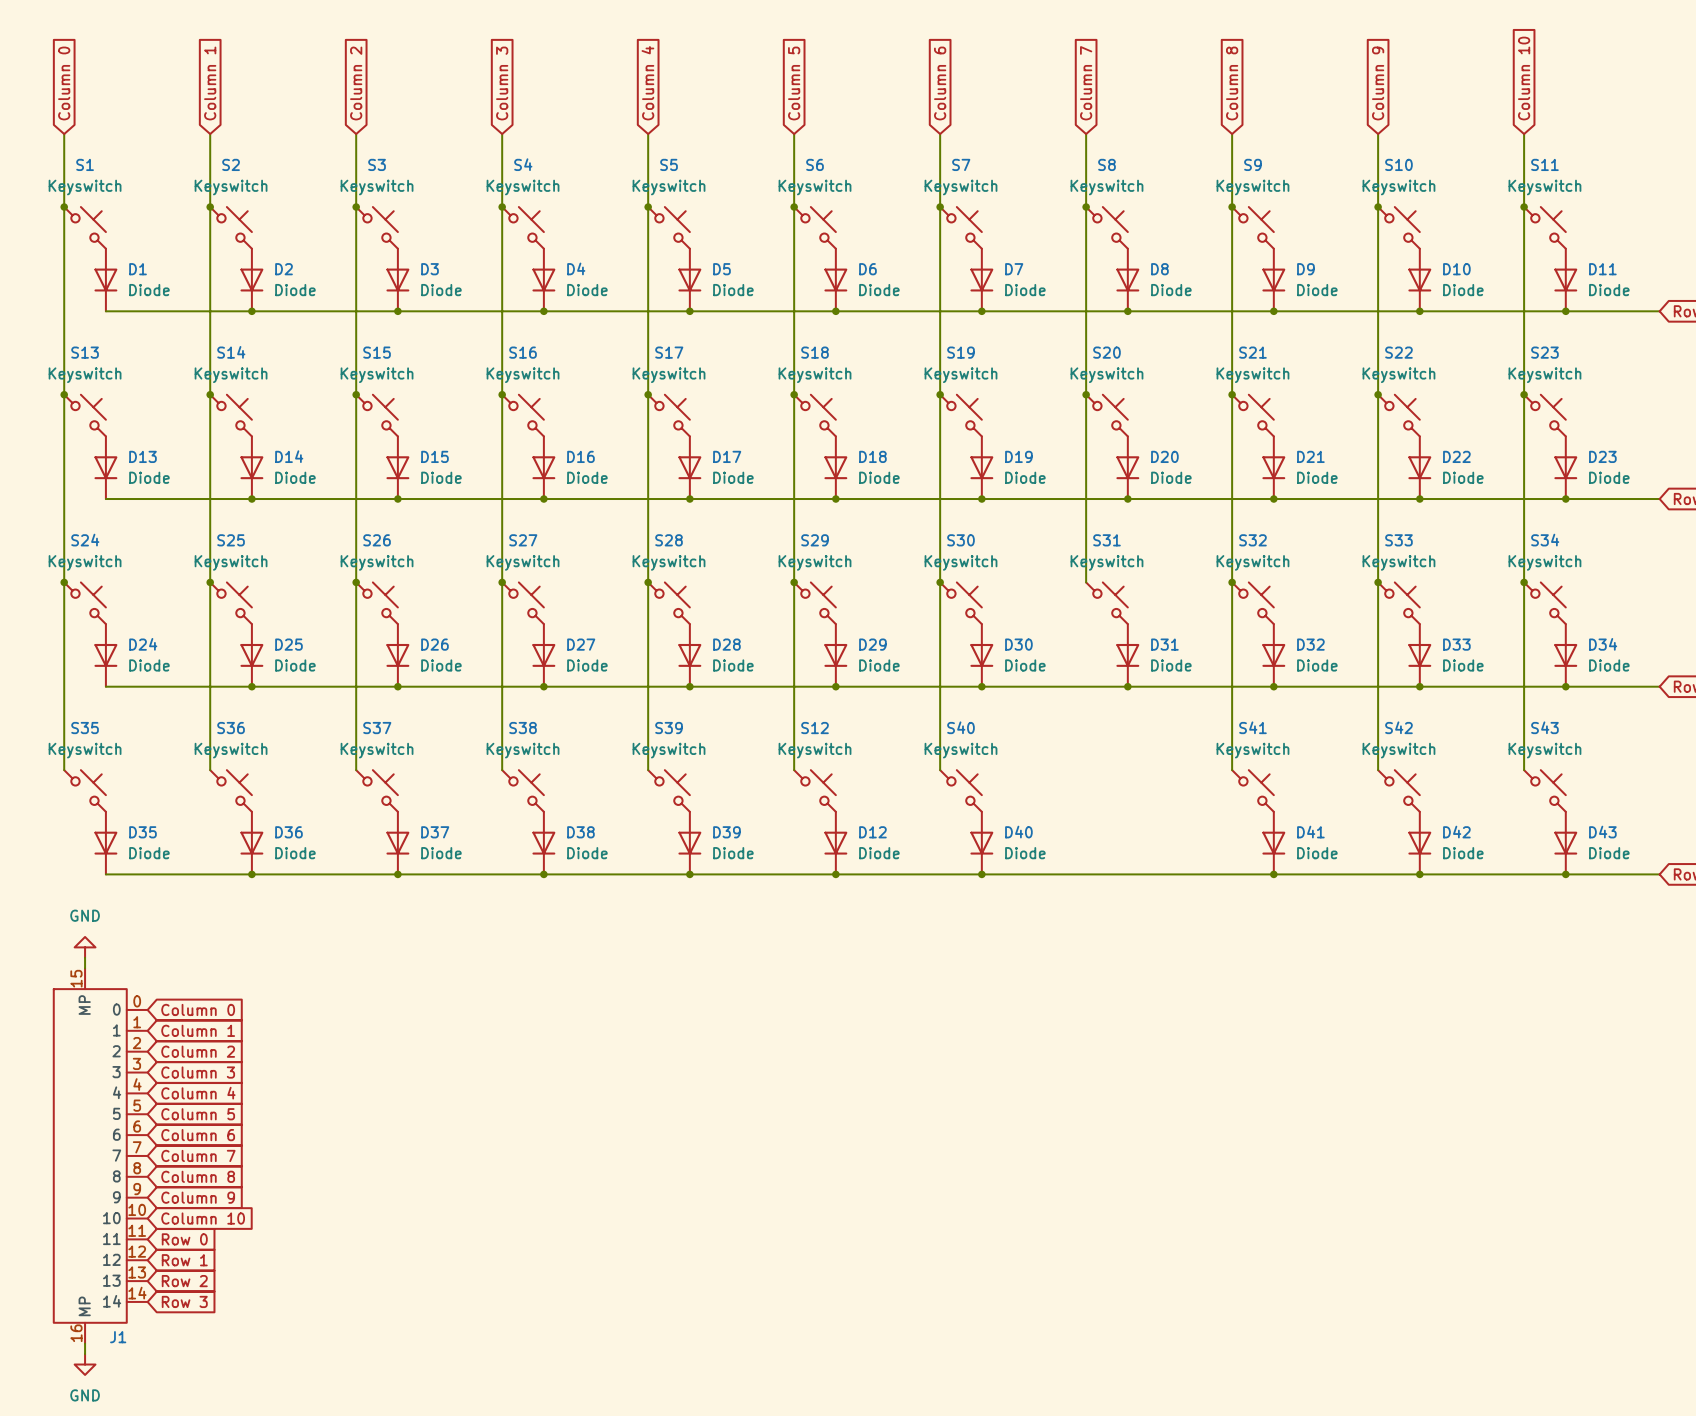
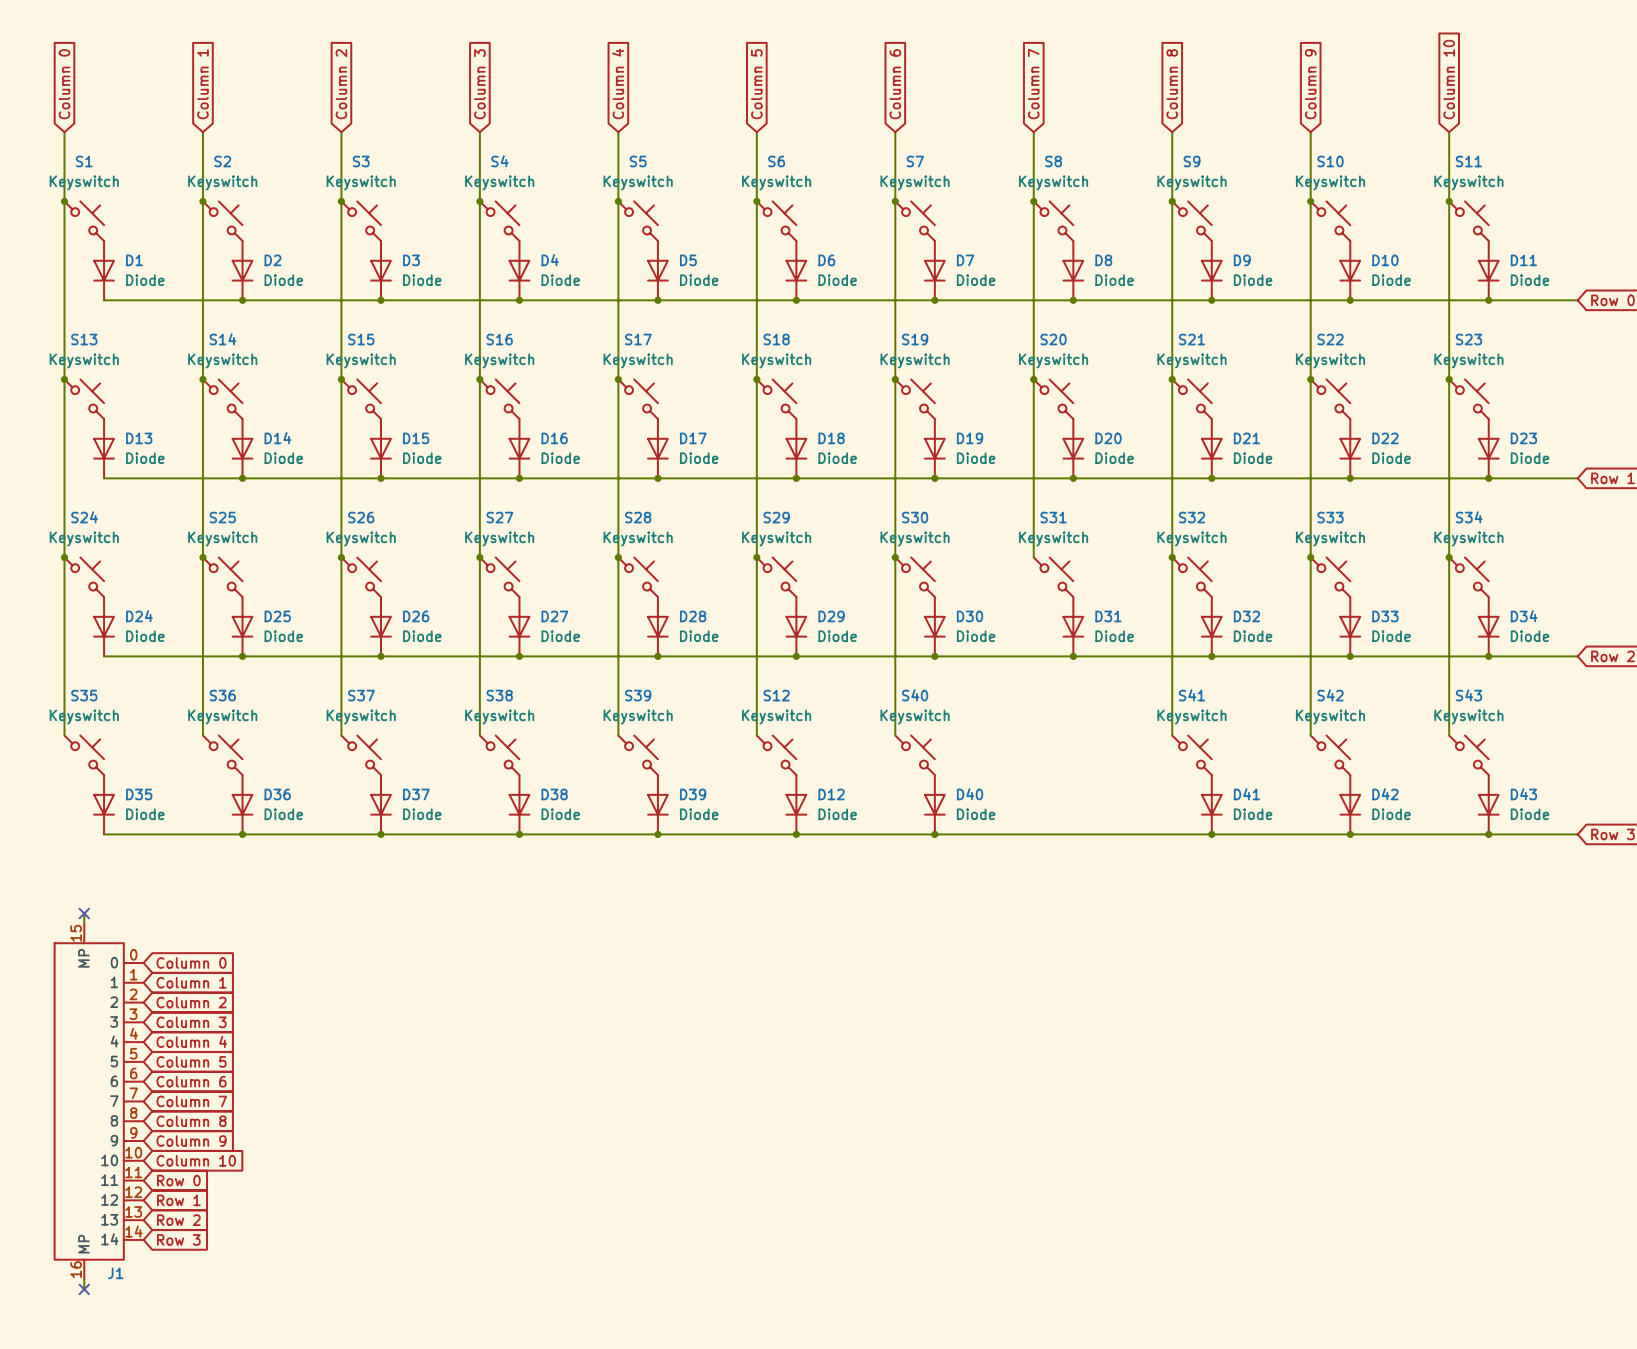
power symbol: GND (85, 947) -> none
no-connect mark: none -> (84, 913)
no-connect mark: none -> (84, 1289)
power symbol: GND (85, 1364) -> none

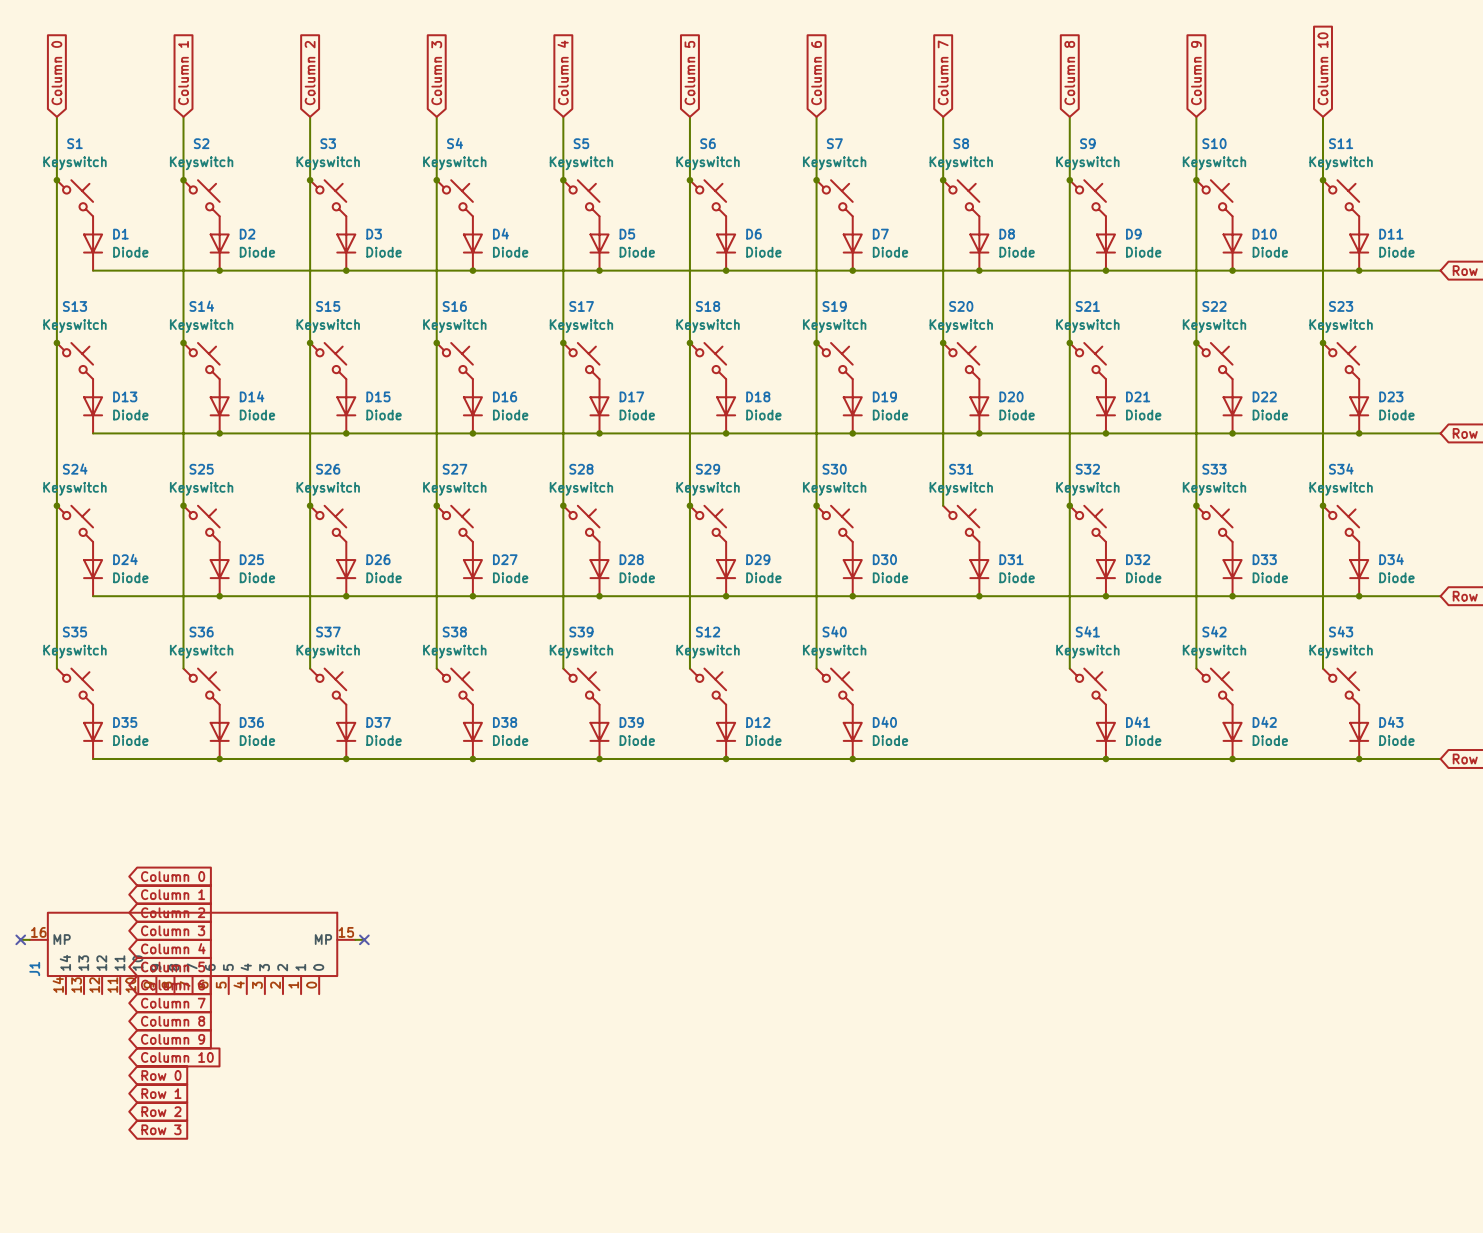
wire: (84, 913) (84, 923) -> none
no-connect mark: (84, 913) -> none
wire: none -> (20, 939) (29, 939)
no-connect mark: none -> (20, 939)
wire: none -> (355, 939) (364, 939)
no-connect mark: none -> (364, 939)
J1 rotation: 0° (89, 1101) -> 90° clockwise (192, 944)
wire: (84, 1279) (84, 1289) -> none
no-connect mark: (84, 1289) -> none

